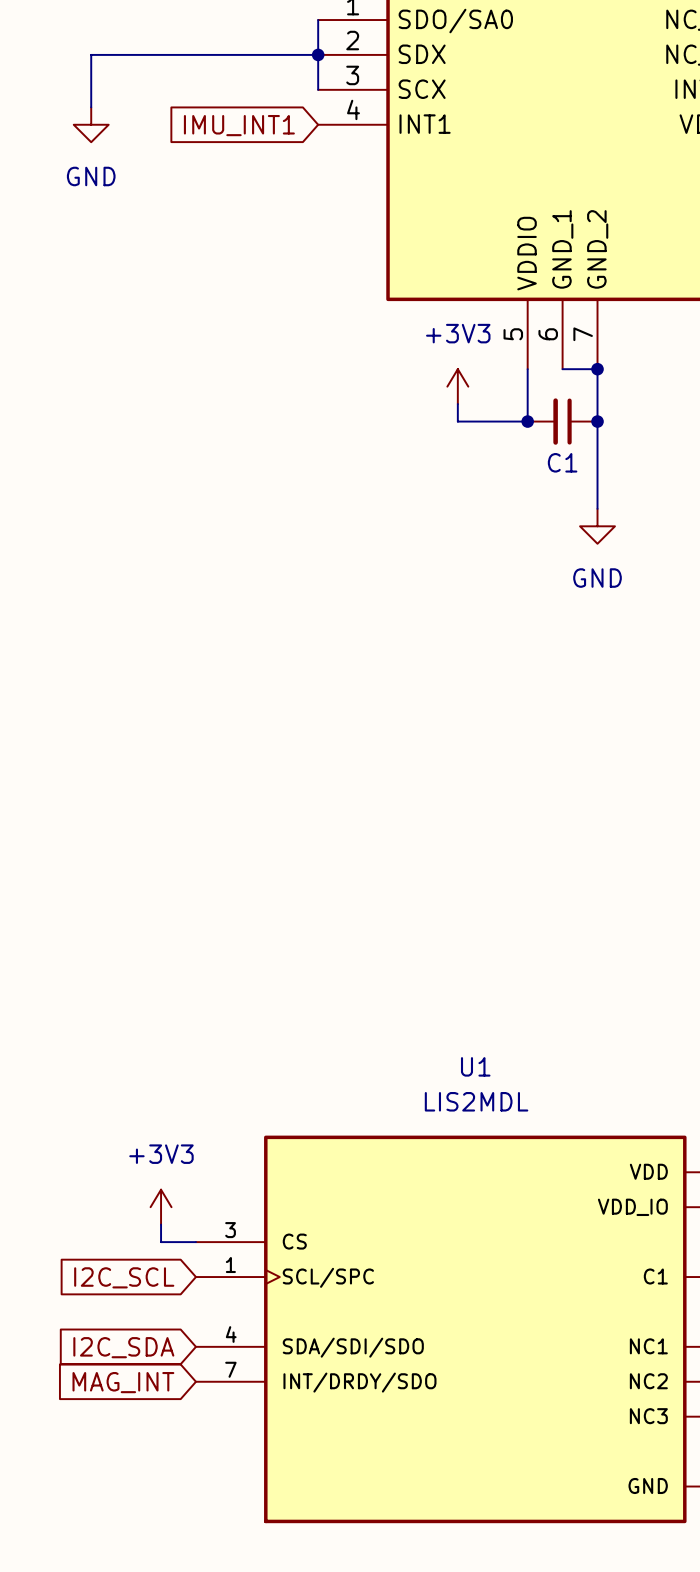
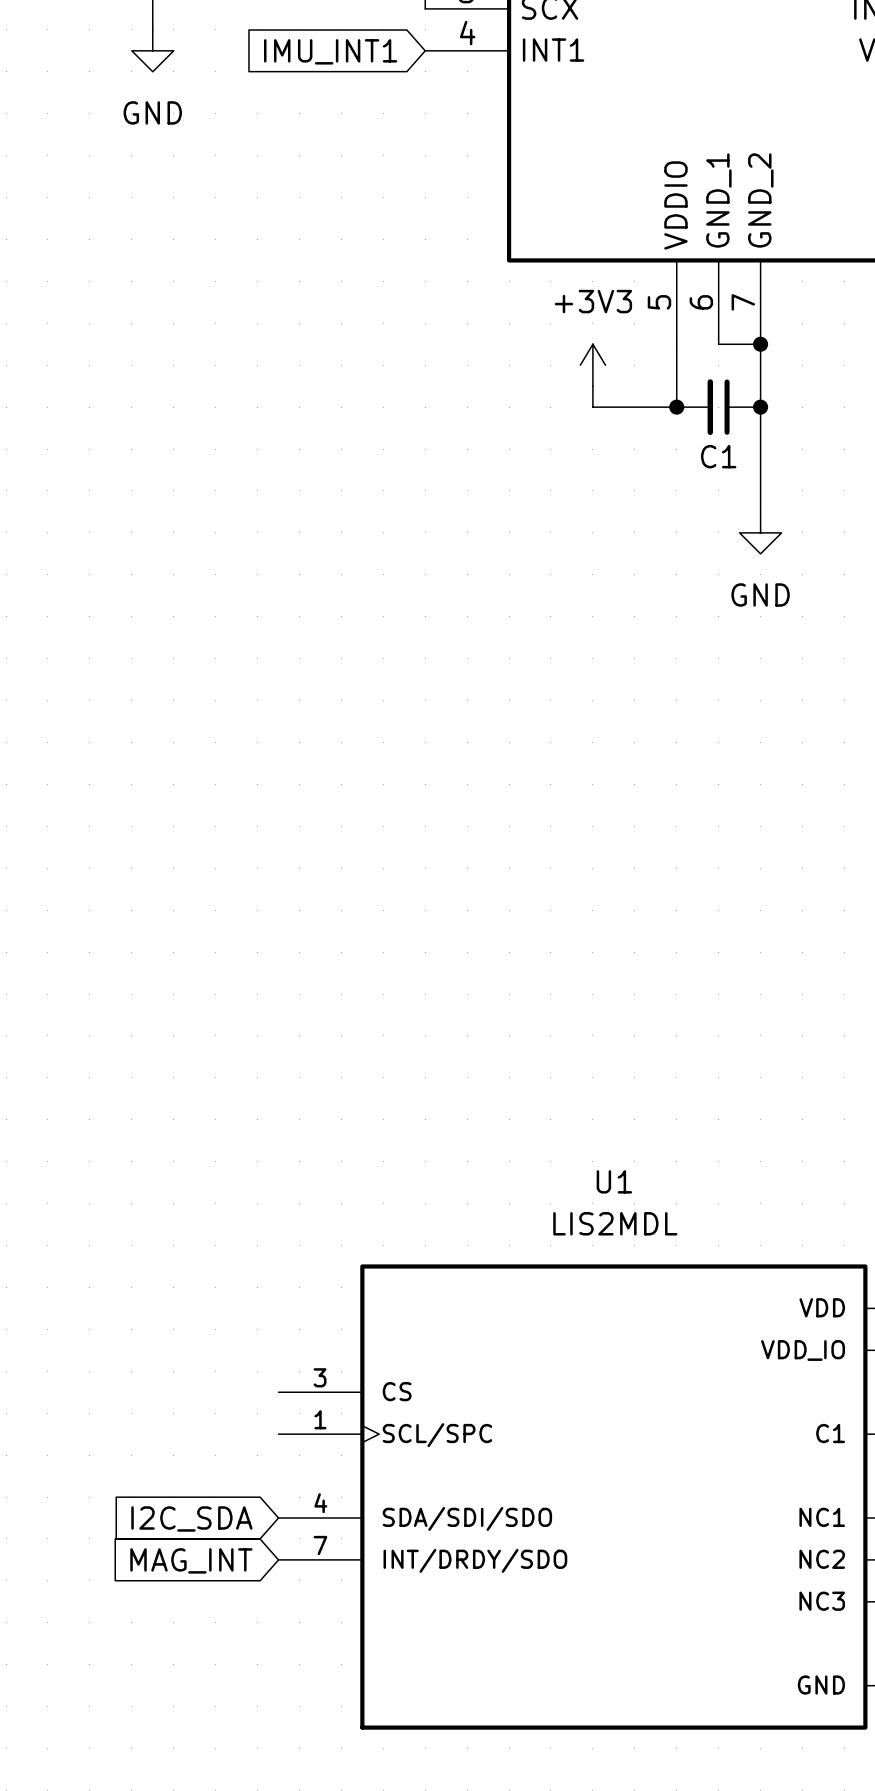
power symbol: +3V3 (161, 1207) -> none
wire: (161, 1224) (161, 1242) (195, 1242) -> none
global label: I2C_SCL (124, 1277) -> none

